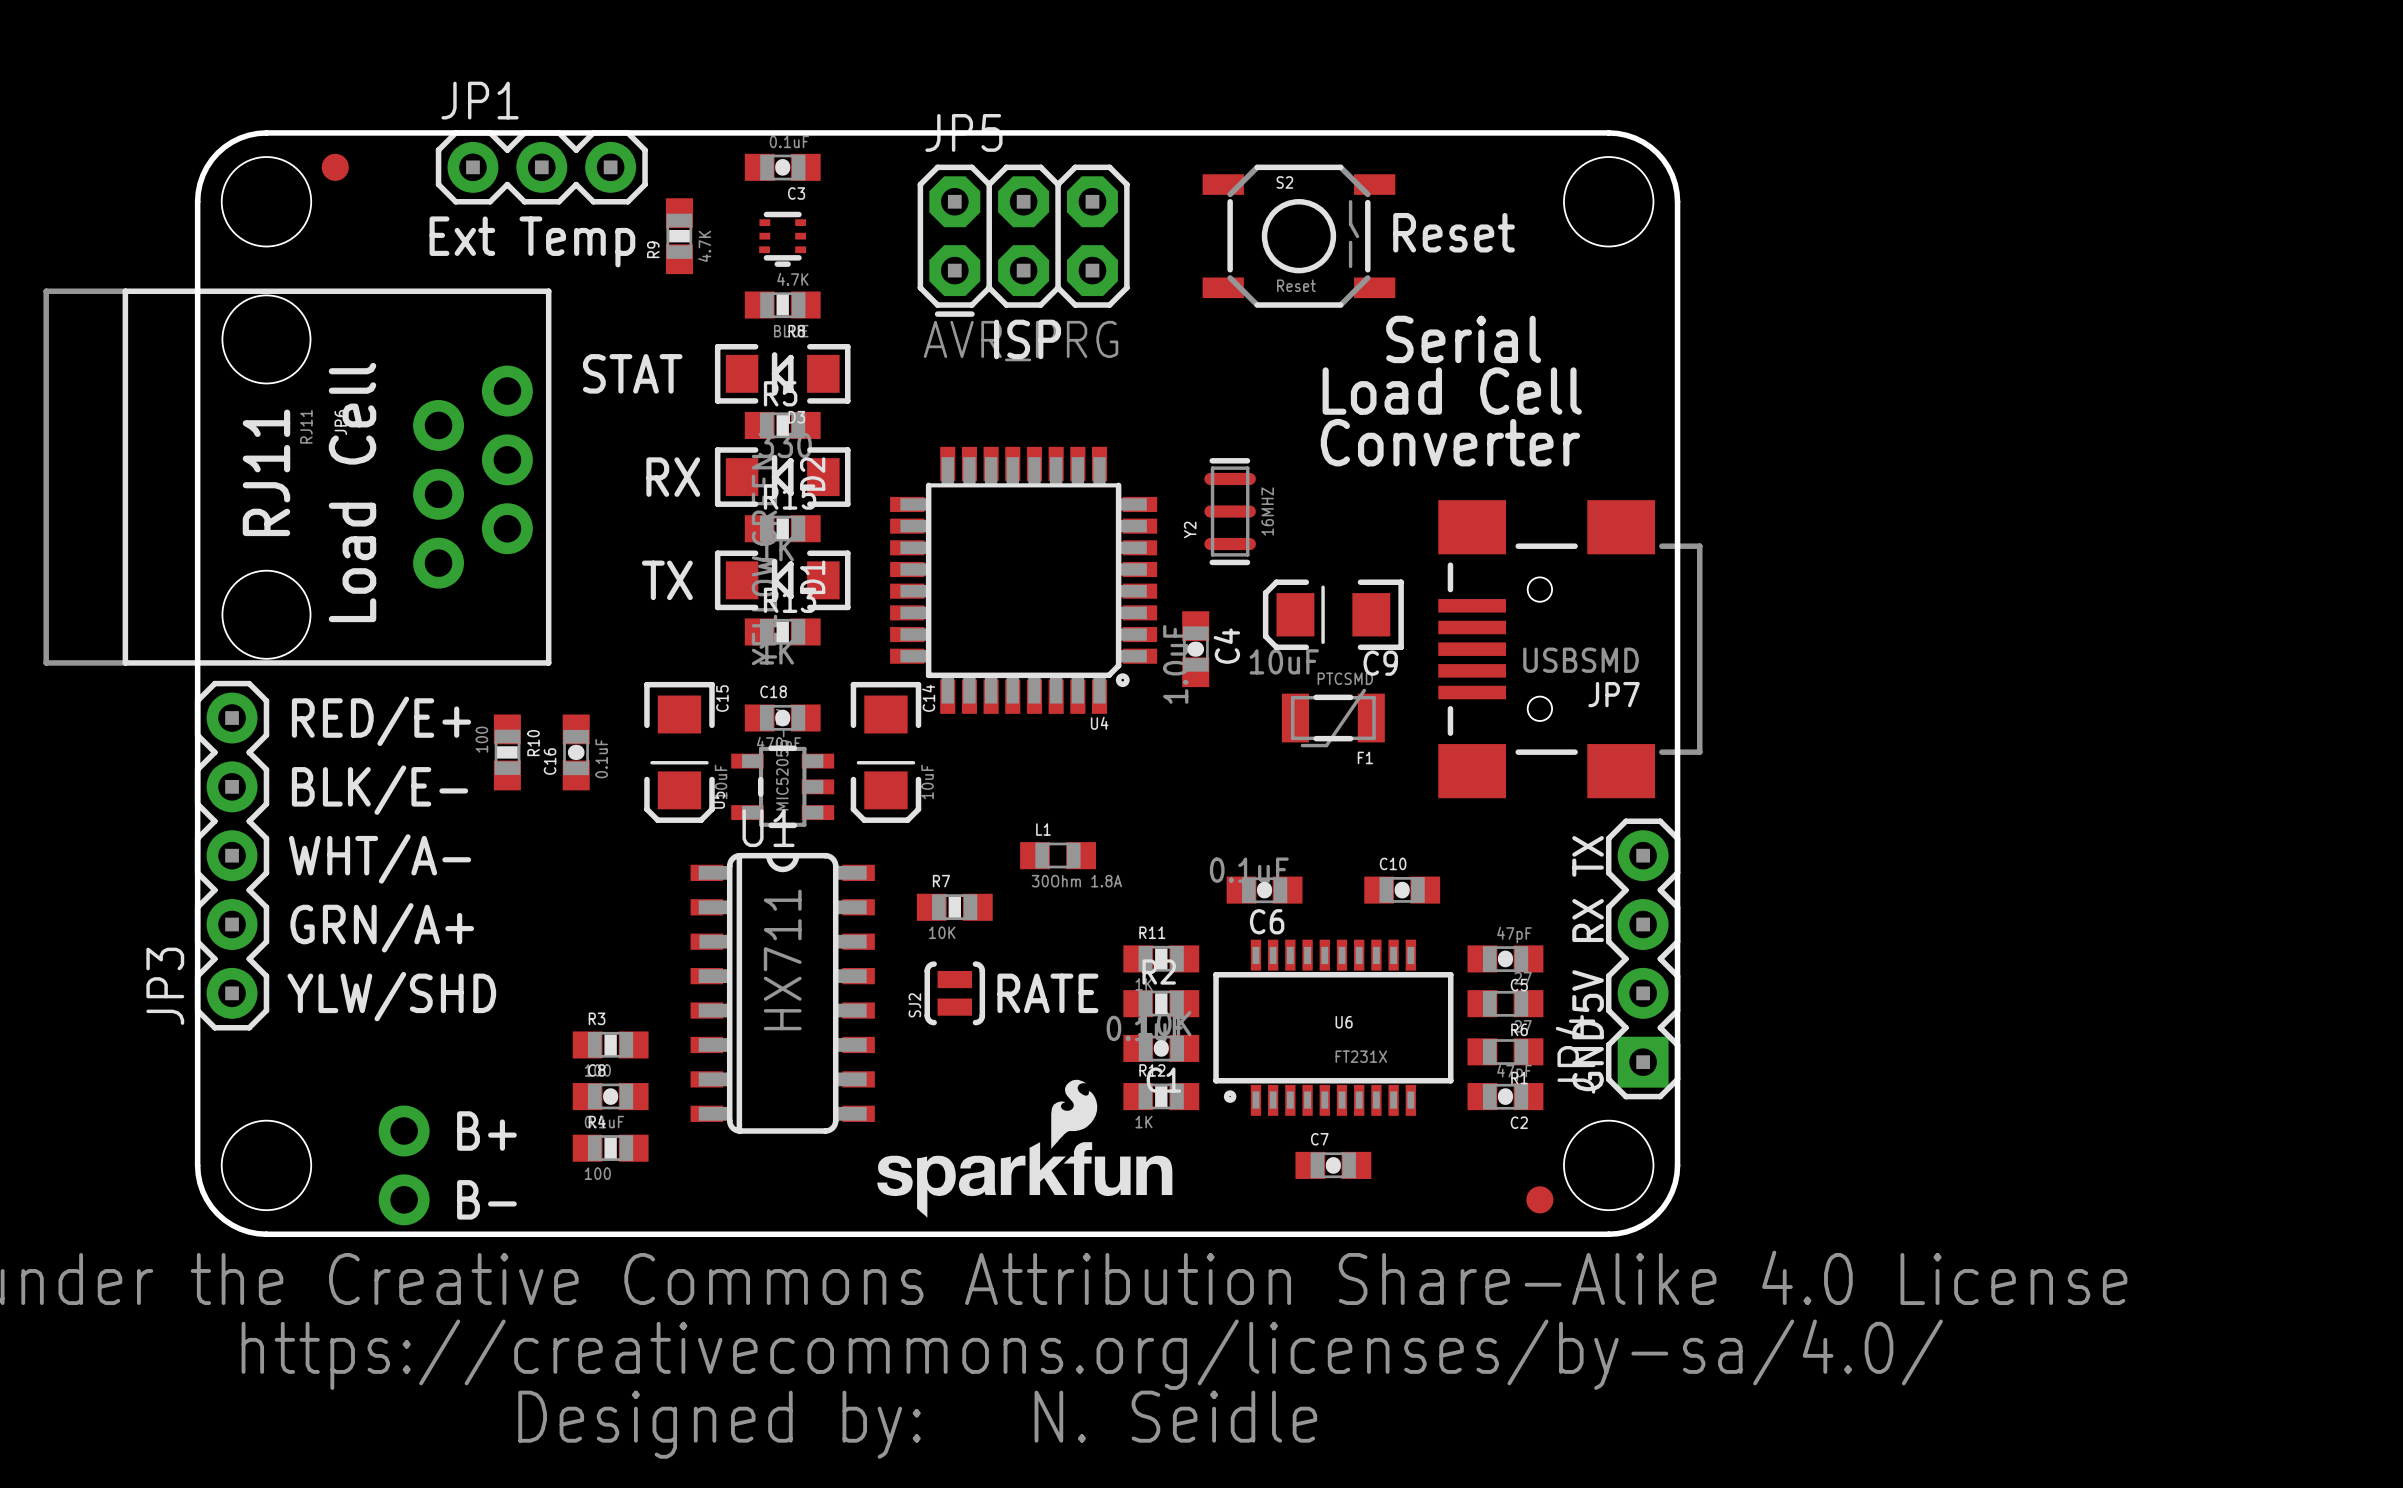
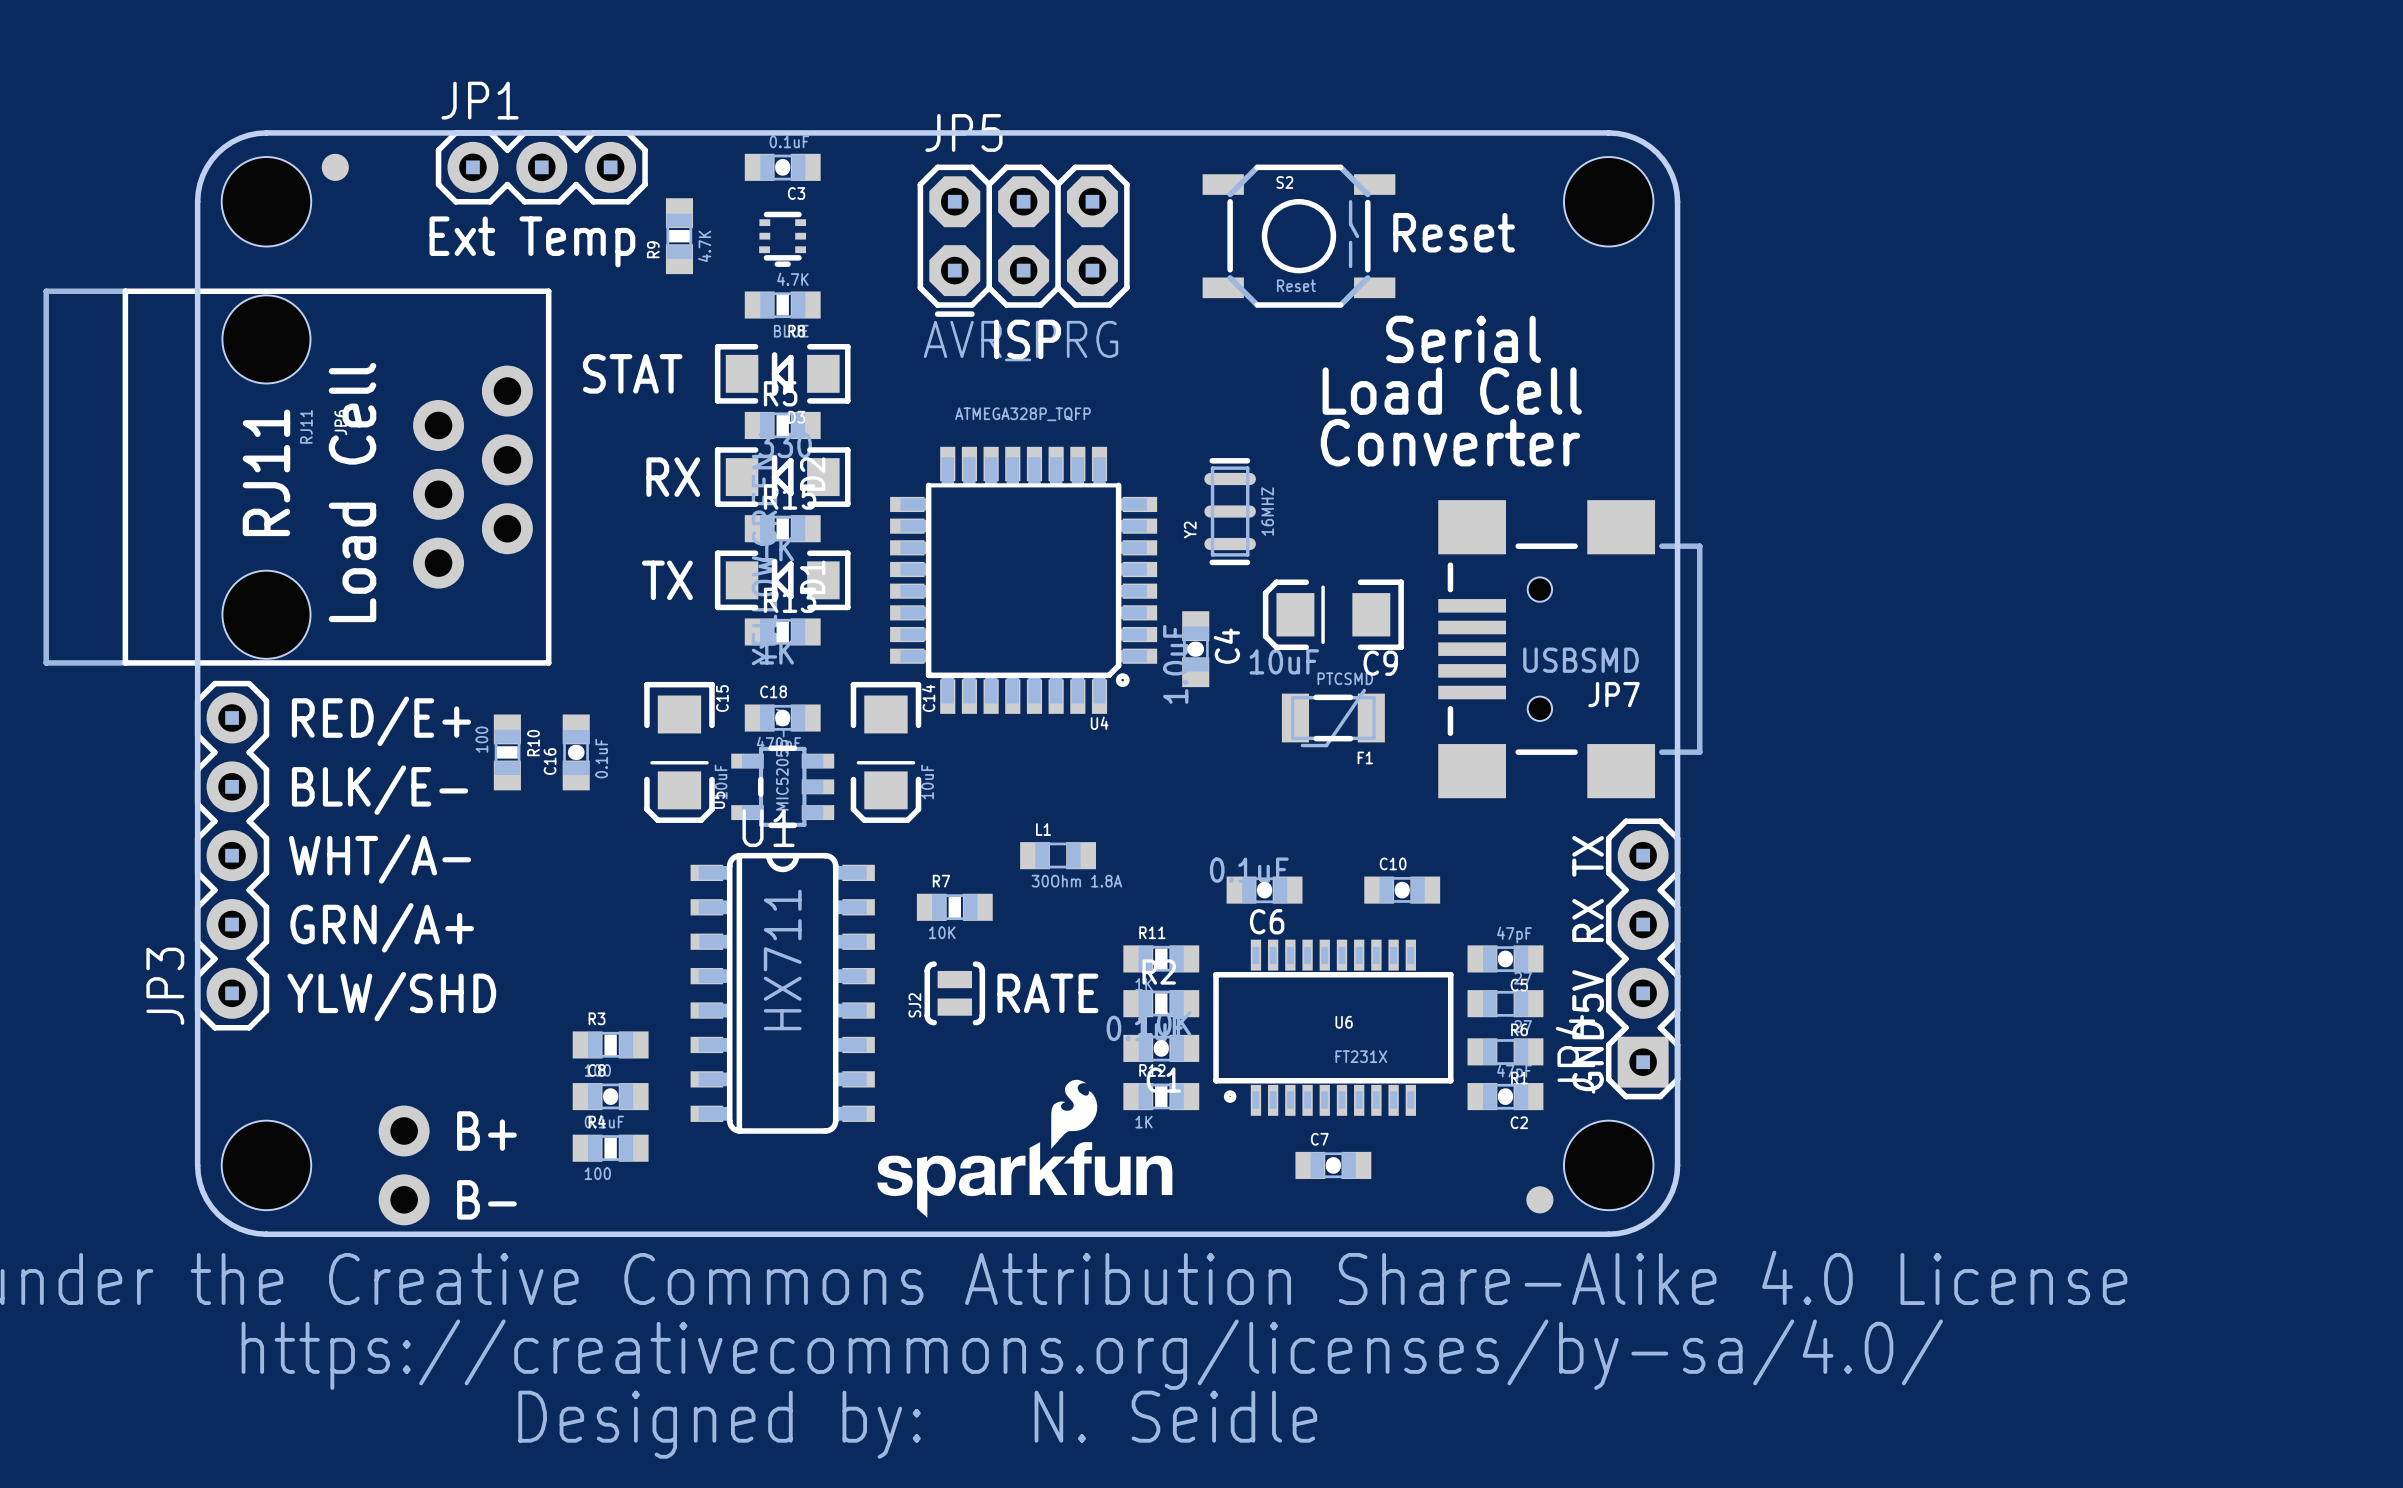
U4 value: none -> ATMEGA328P_TQFP (1022, 414)

